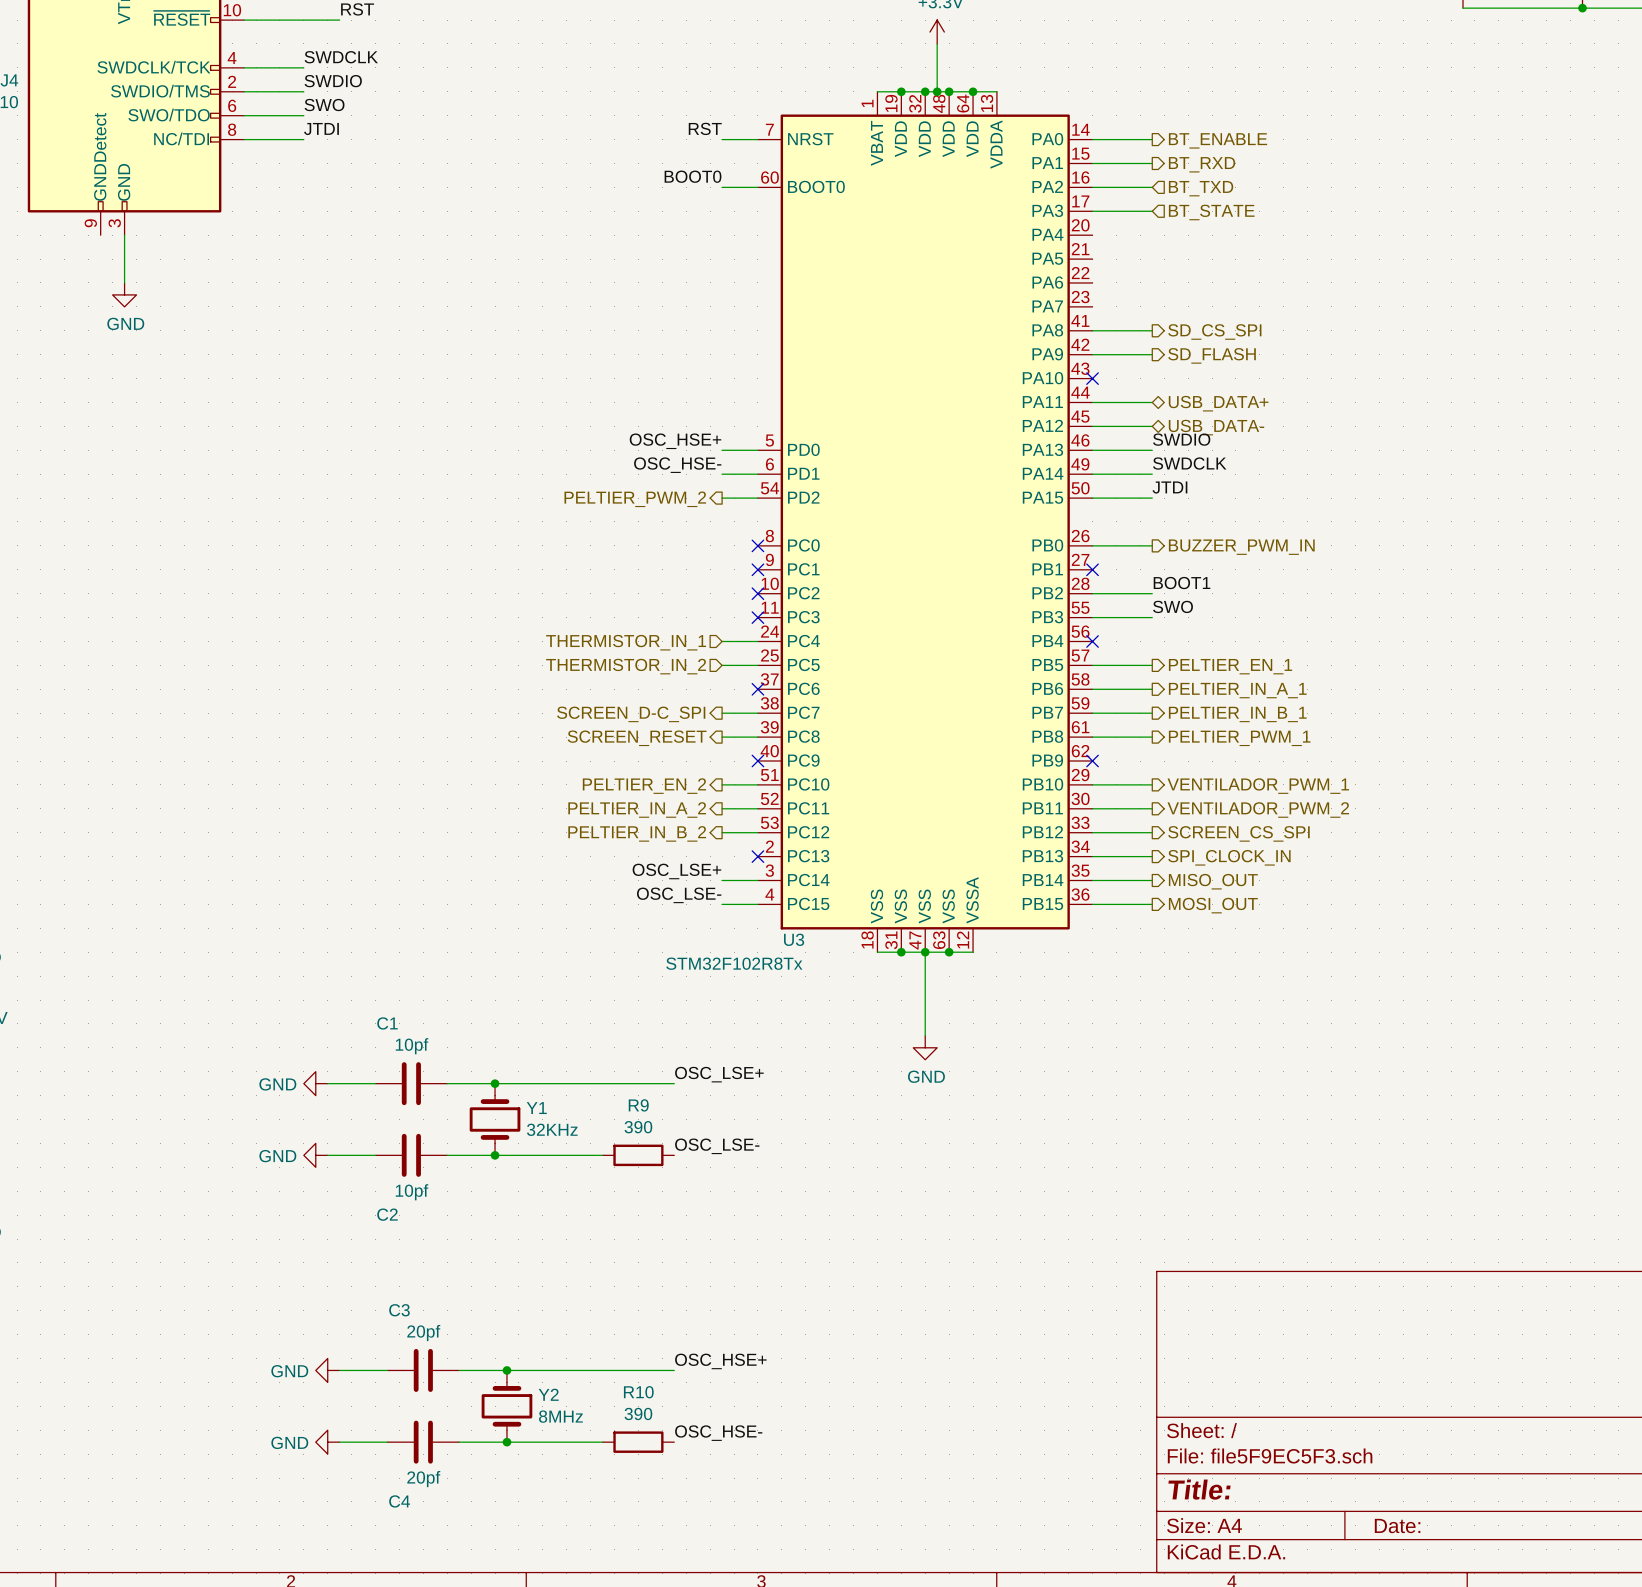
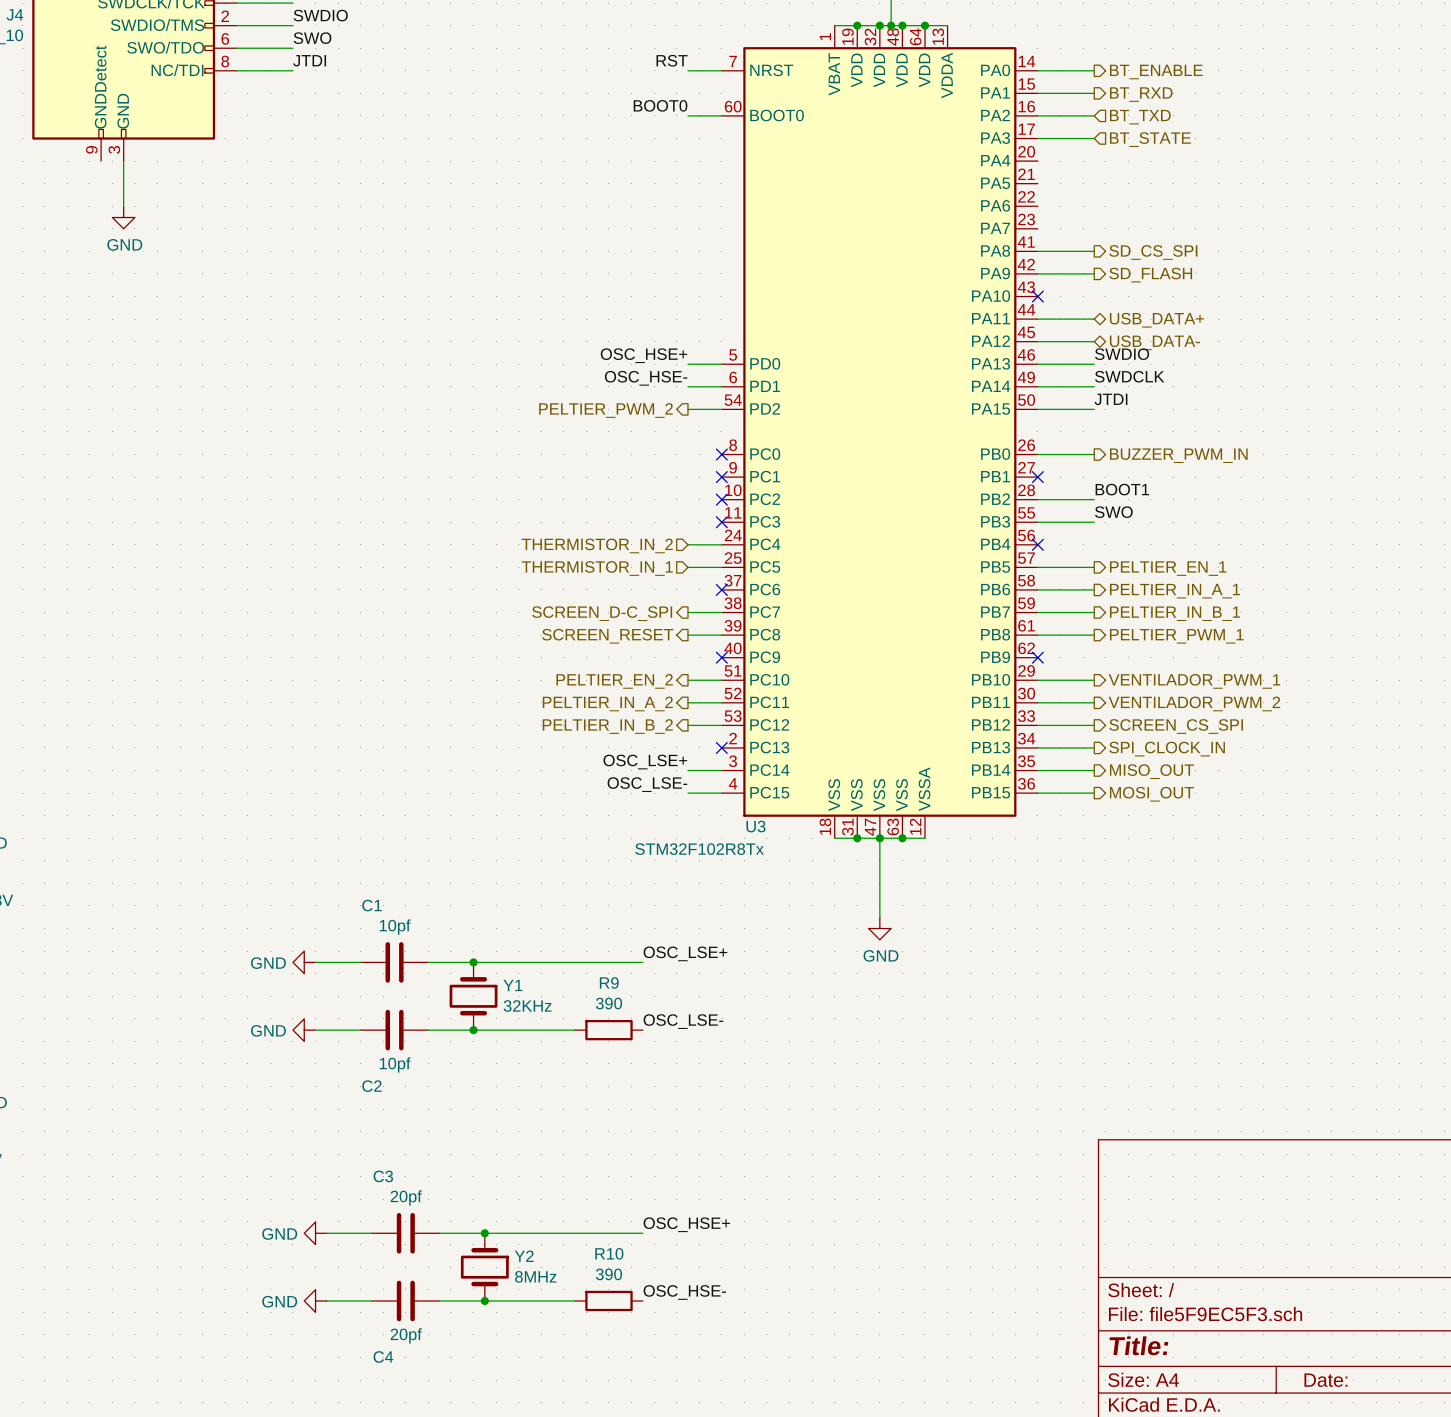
hierarchical label: THERMISTOR_IN_1 (626, 642) -> THERMISTOR_IN_2 (597, 545)
hierarchical label: THERMISTOR_IN_2 (626, 666) -> THERMISTOR_IN_1 (597, 568)

